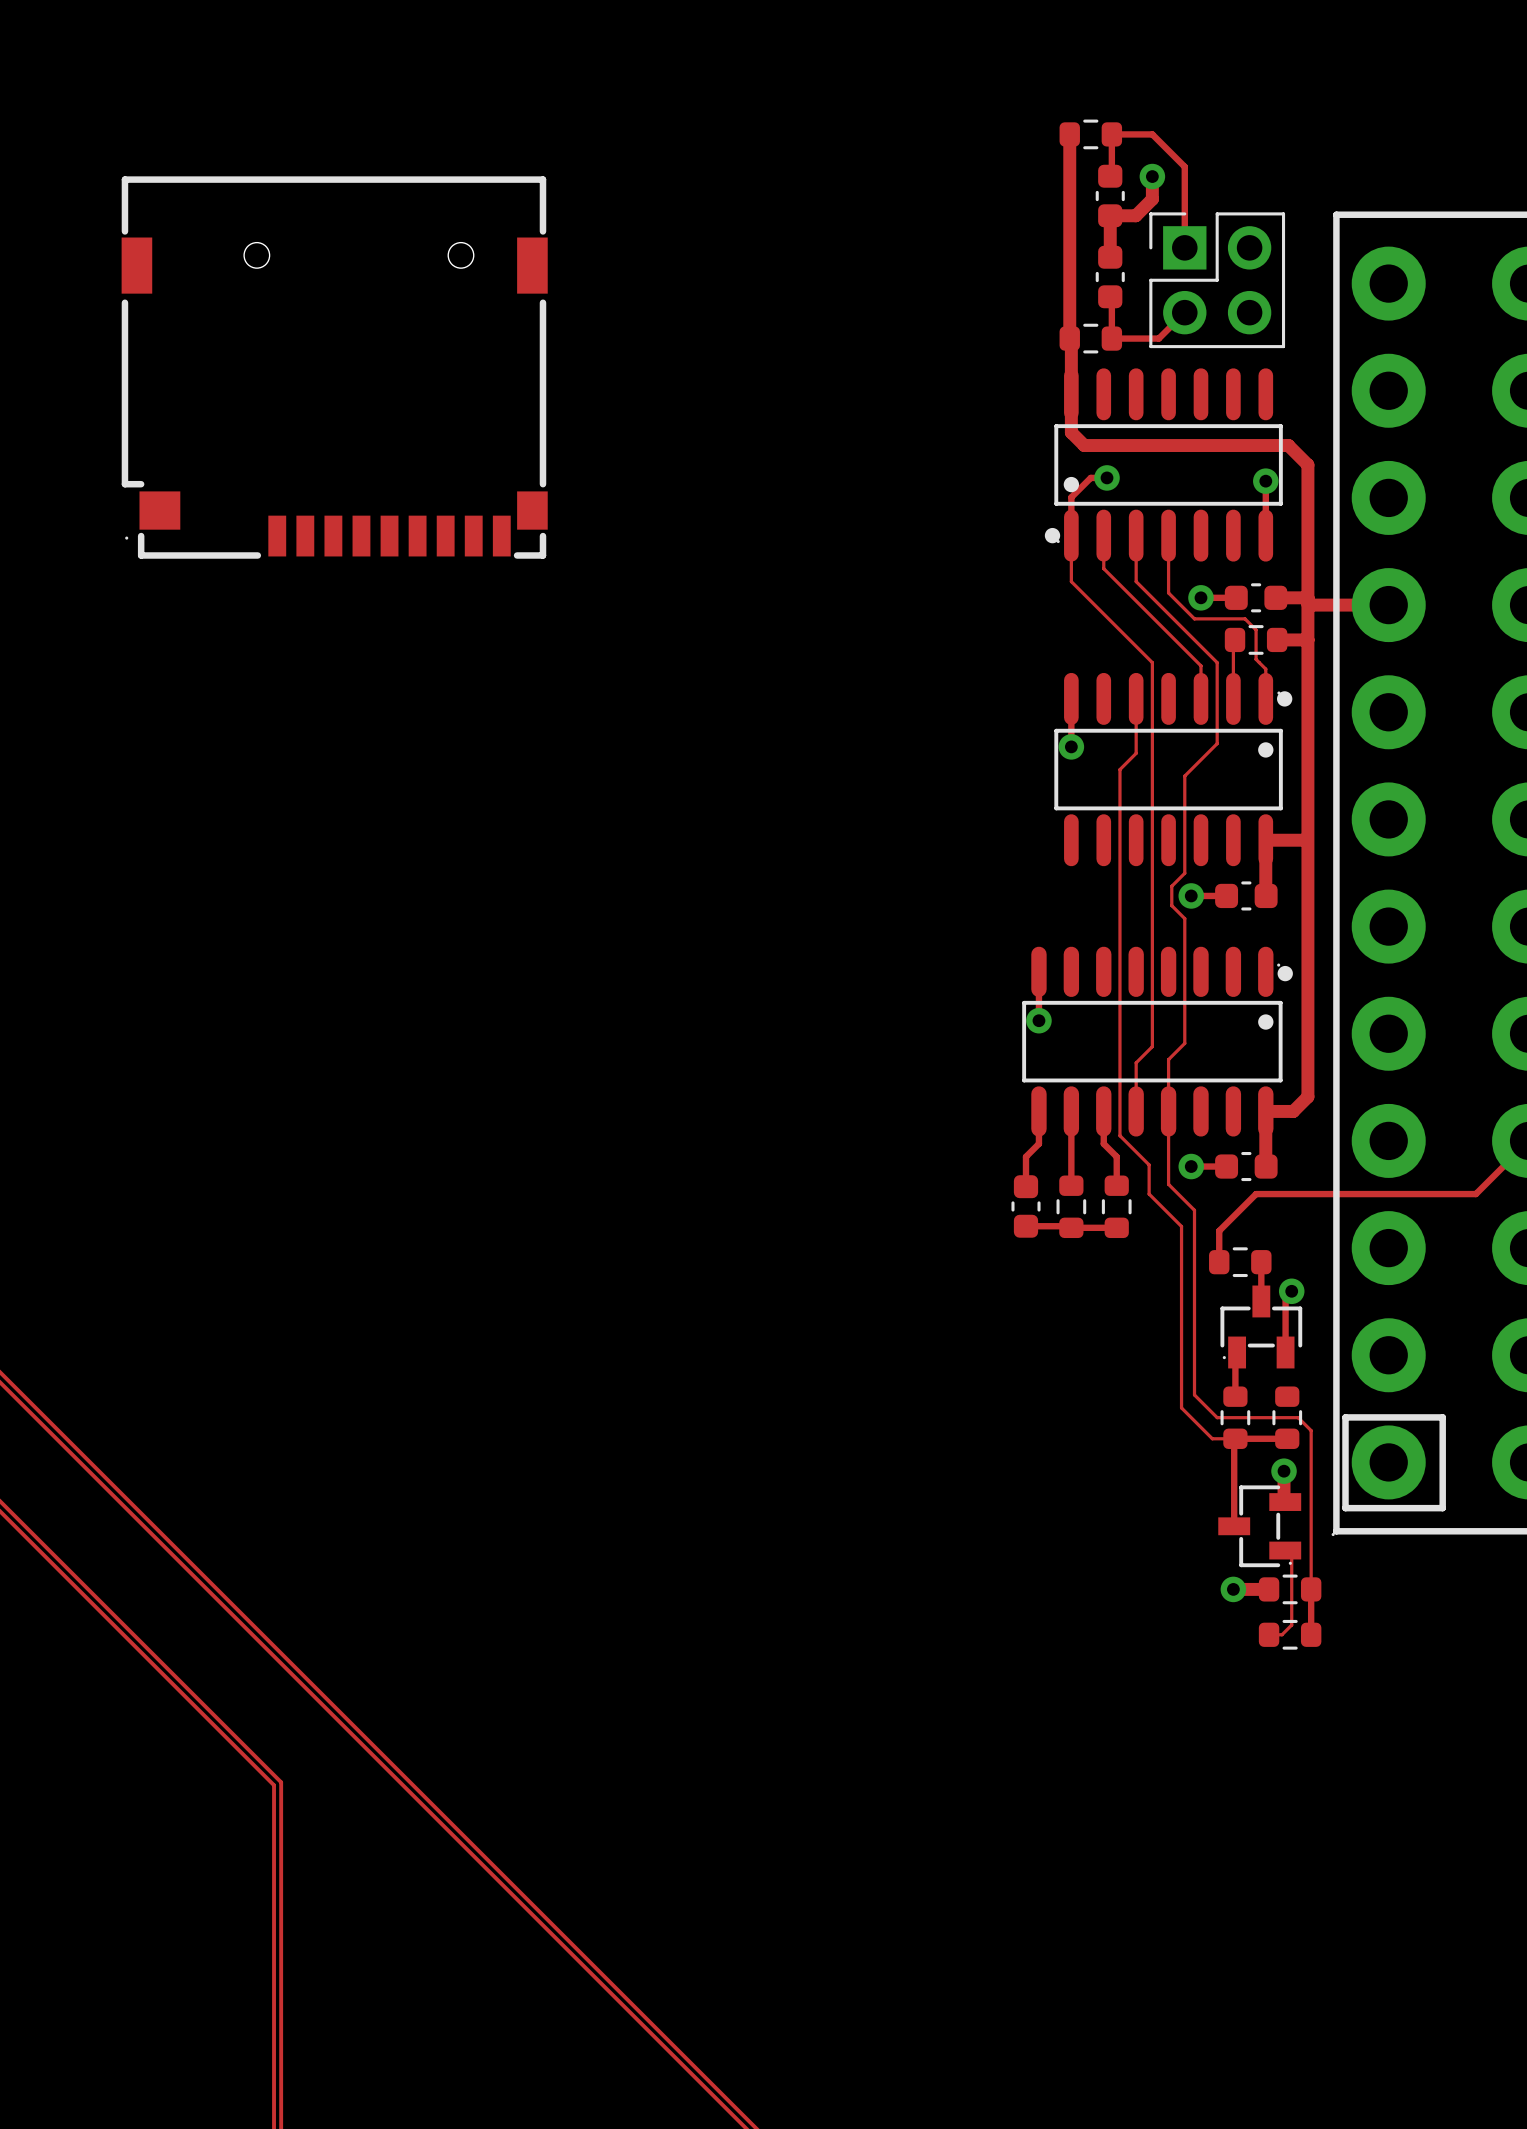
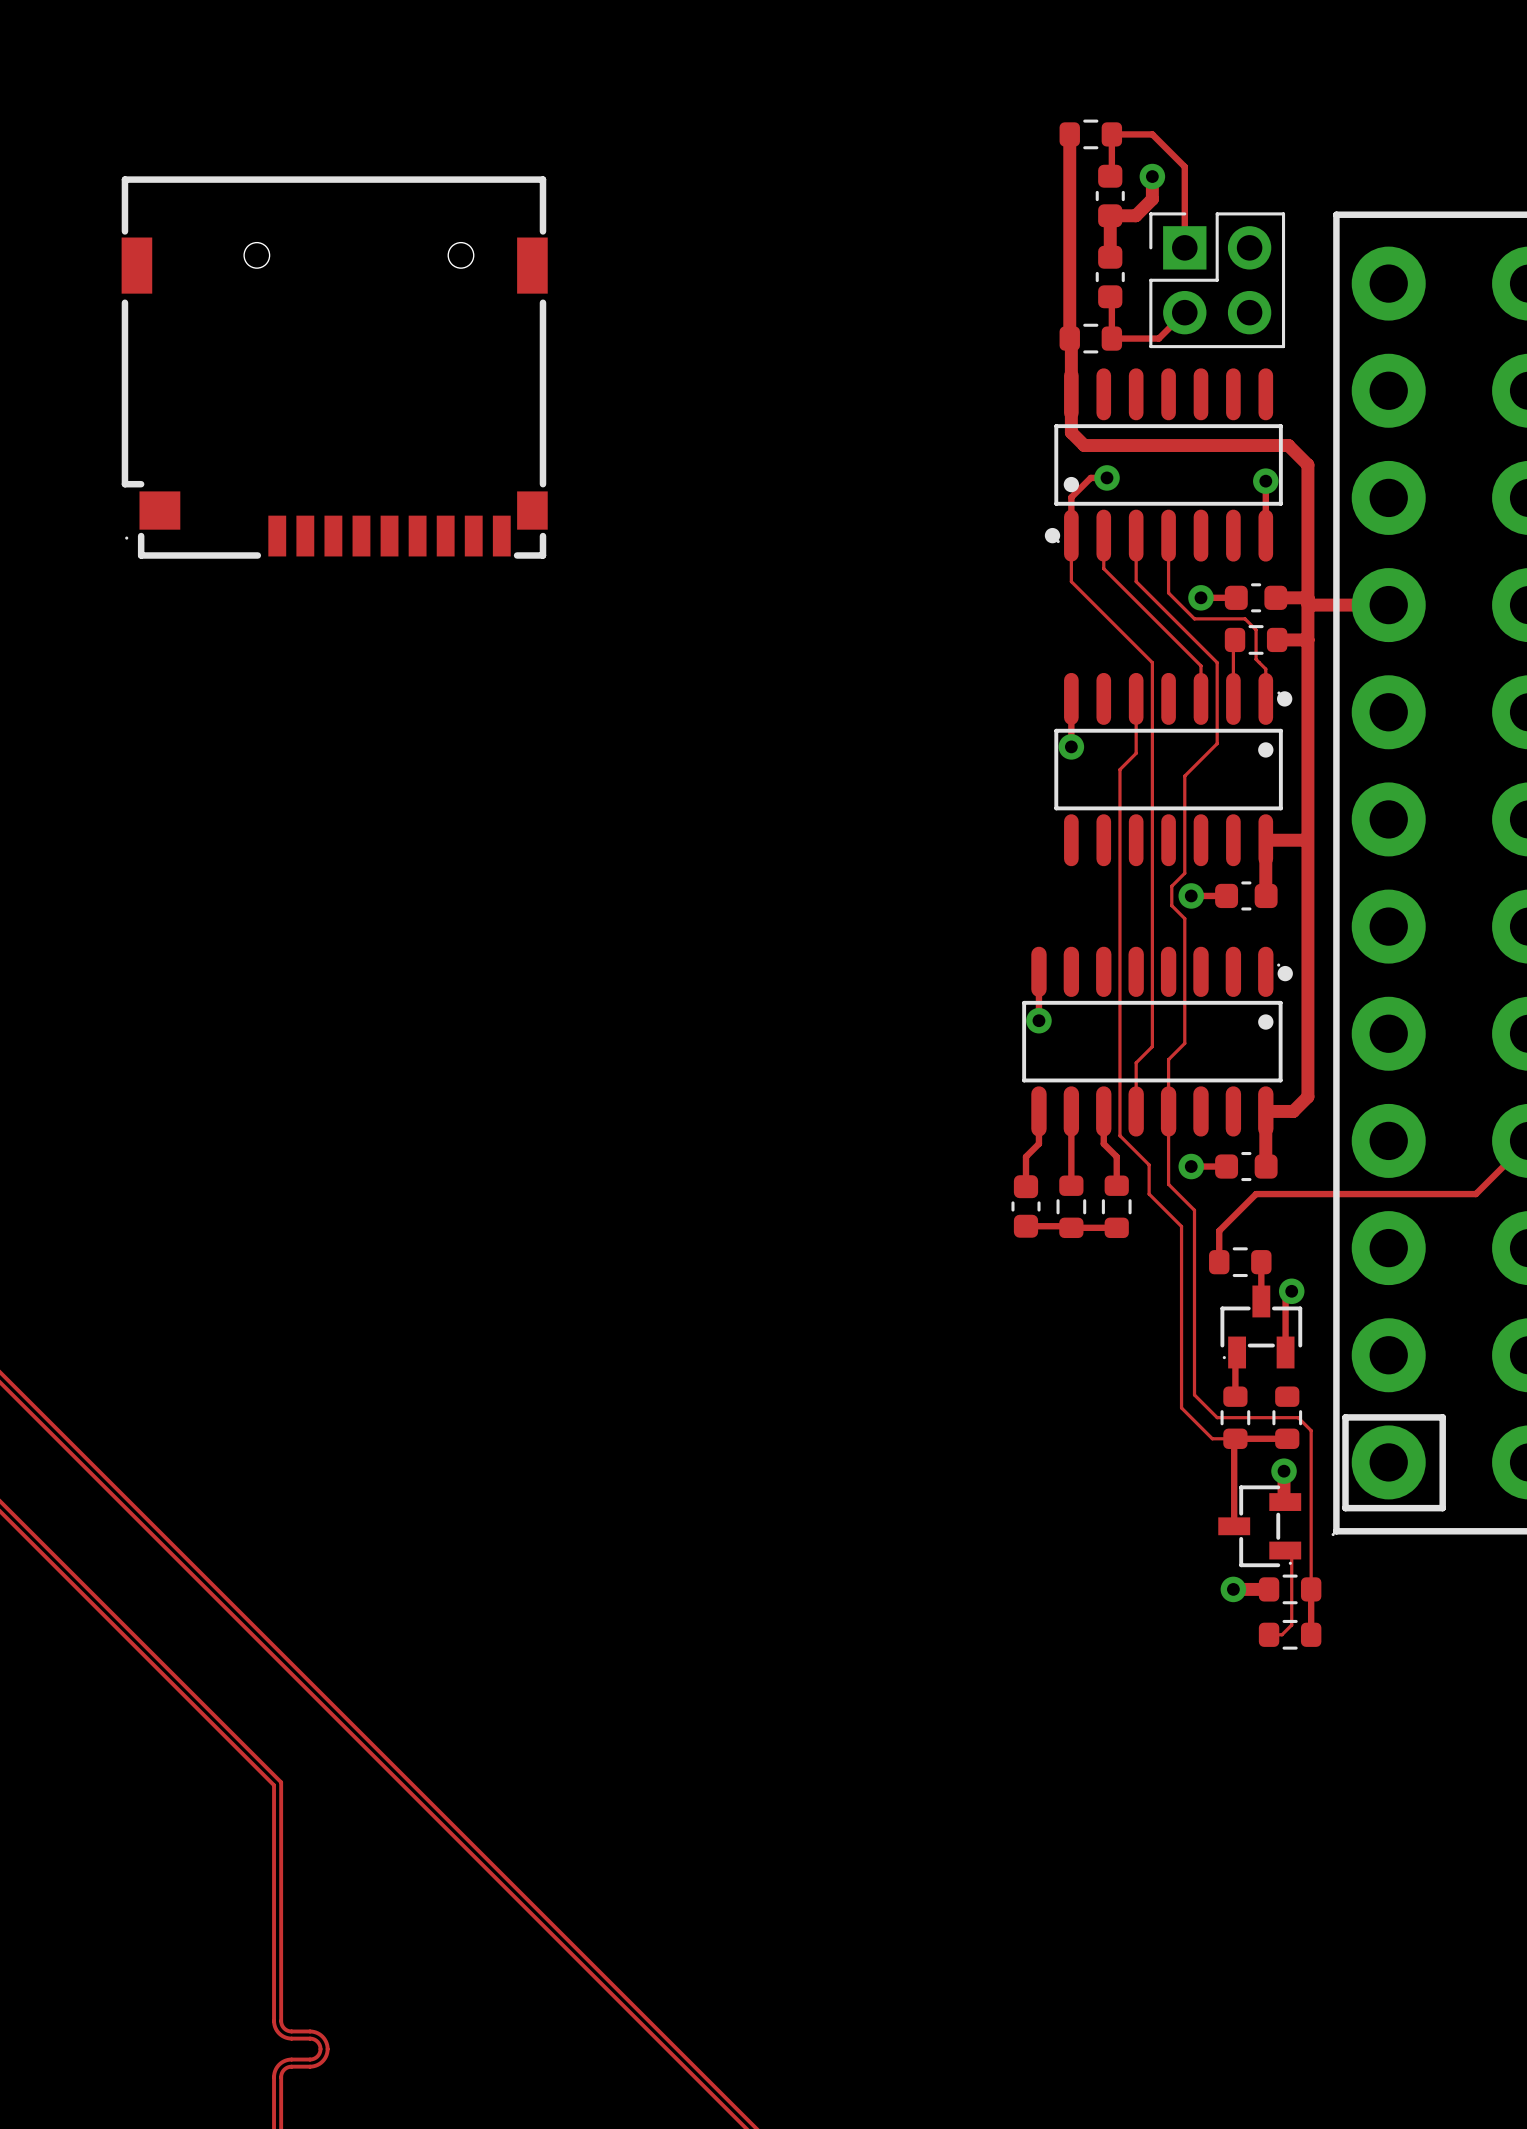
track: (274, 2021) (274, 2077) -> (274, 2021) (276, 2030) (282, 2035) (289, 2038) (313, 2039) (318, 2042) (320, 2049) (318, 2055) (313, 2058) (289, 2059) (282, 2062) (276, 2067) (274, 2077)
track: (281, 2021) (281, 2077) -> (281, 2021) (283, 2027) (288, 2030) (312, 2031) (319, 2034) (324, 2039) (327, 2049) (324, 2058) (319, 2063) (312, 2066) (288, 2067) (282, 2071) (281, 2077)

